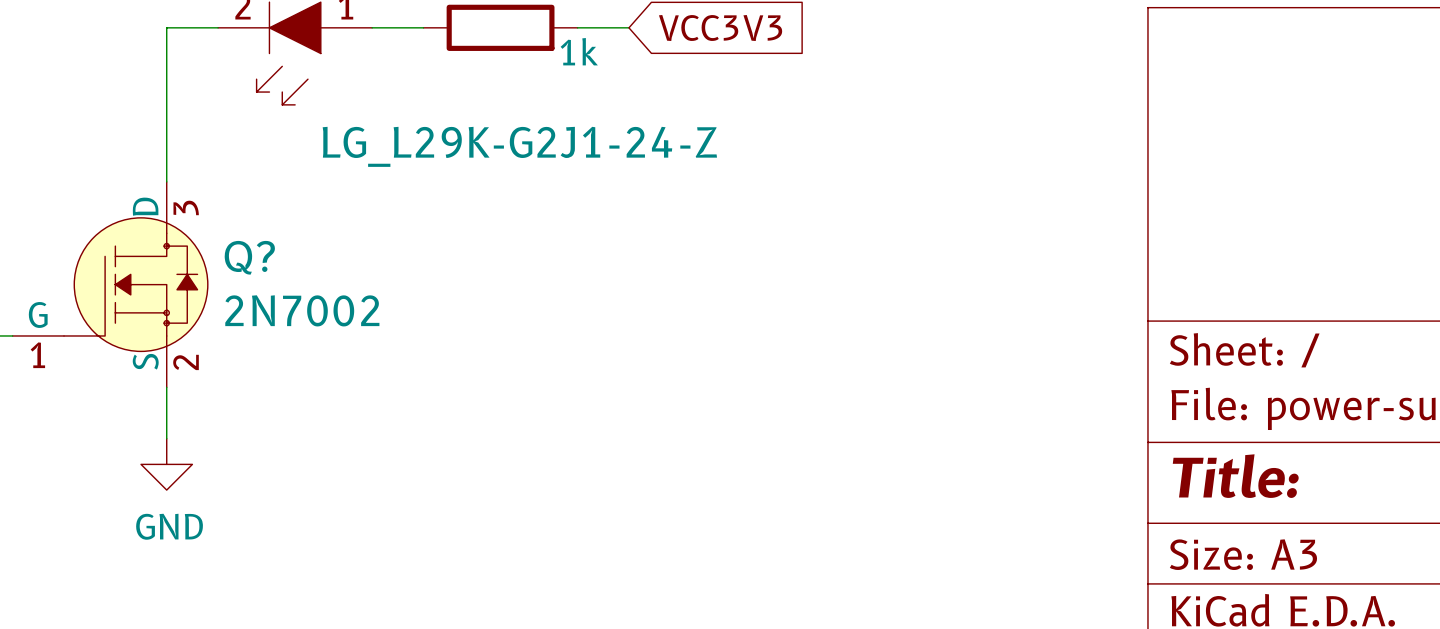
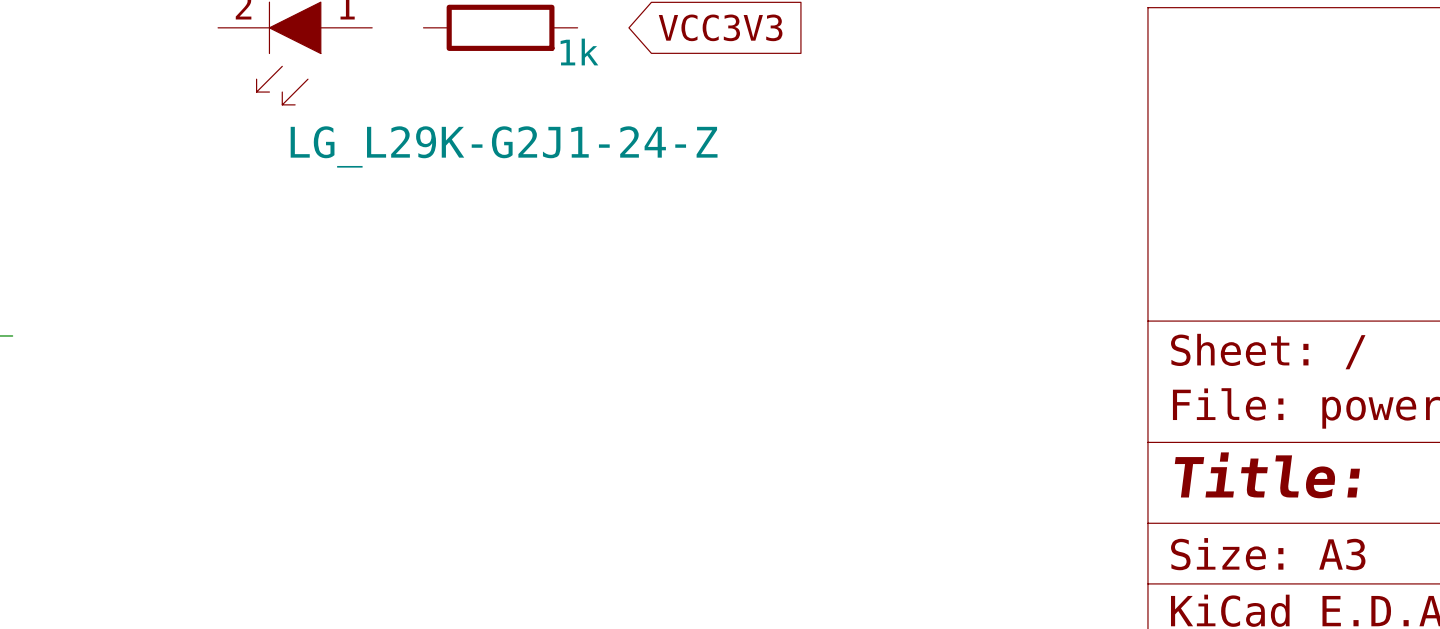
wire: (218, 27) (166, 27) (166, 181) -> none
wire: (372, 27) (423, 27) -> none
wire: (577, 27) (628, 27) -> none
Q?: 2N7002 (110, 284) -> none
wire: (166, 387) (166, 438) -> none
power symbol: GND (166, 464) -> none

